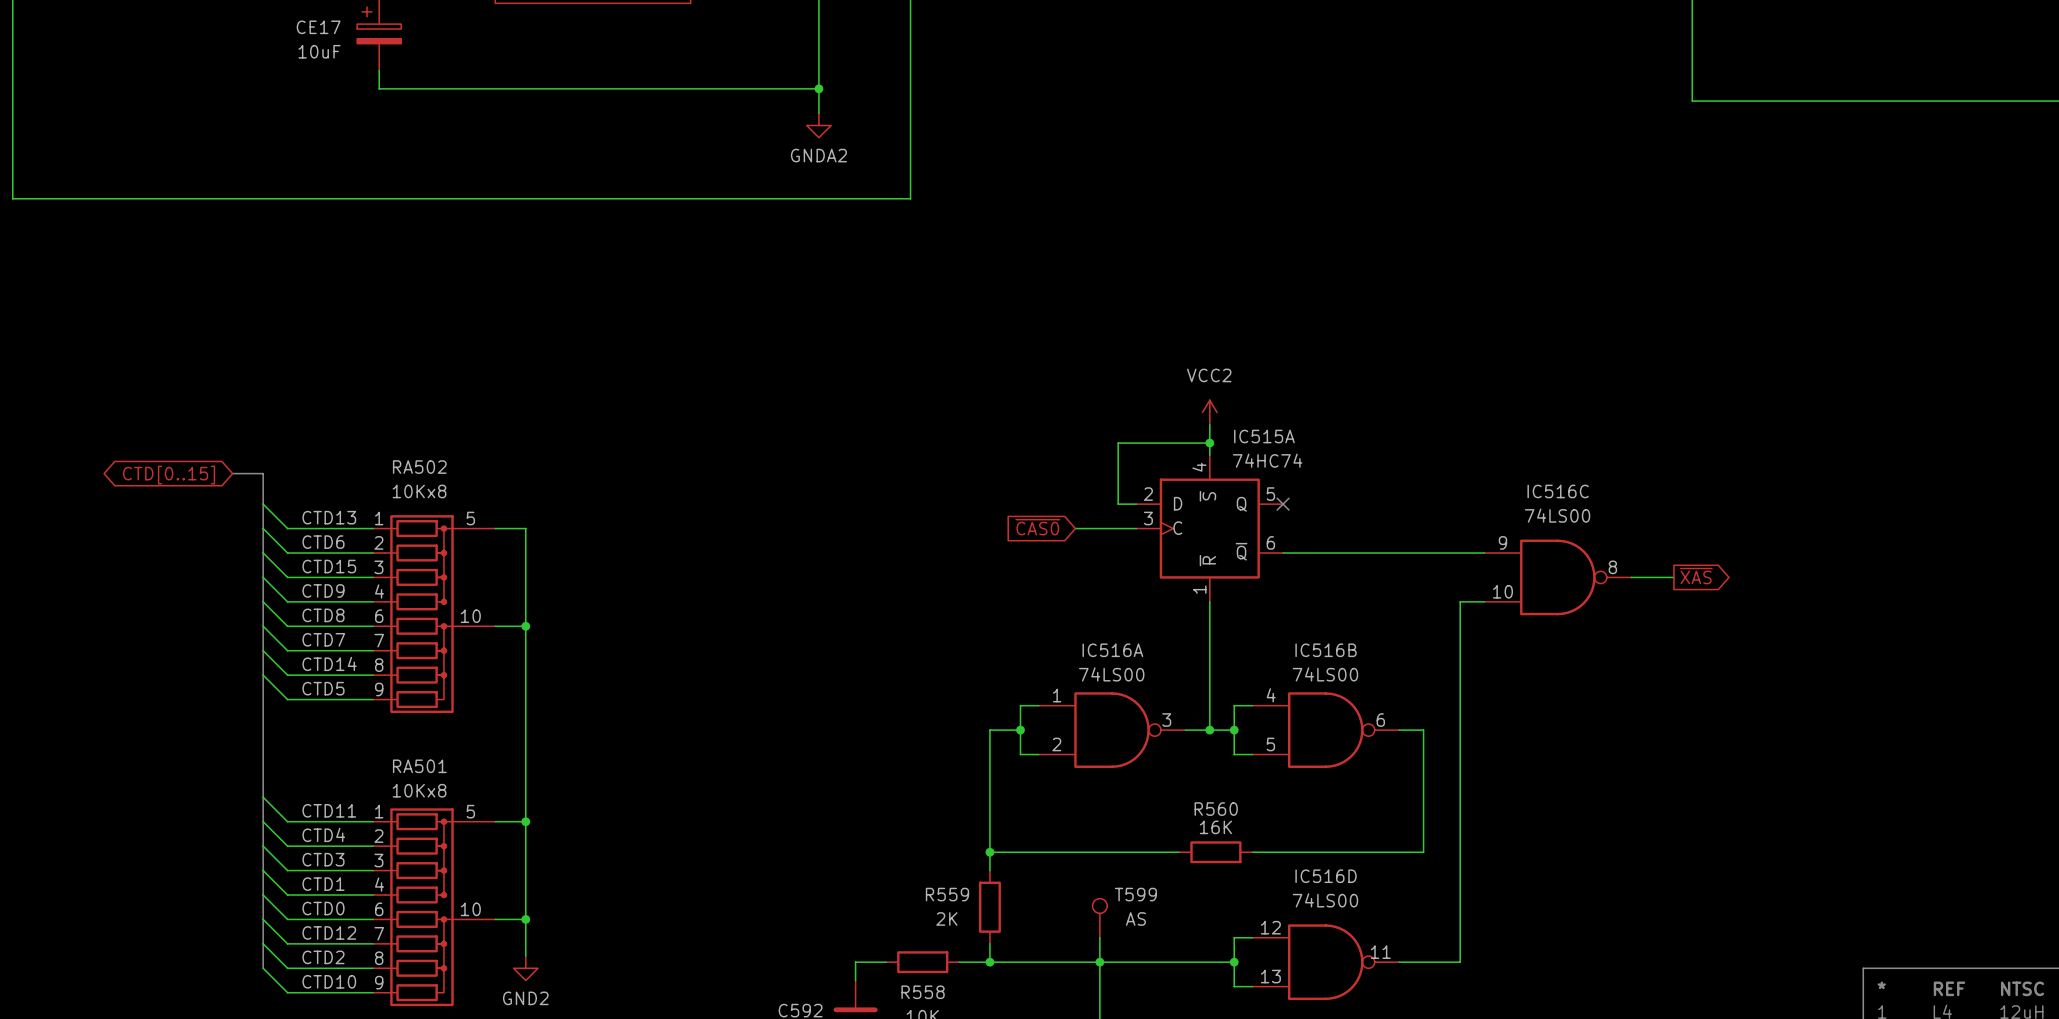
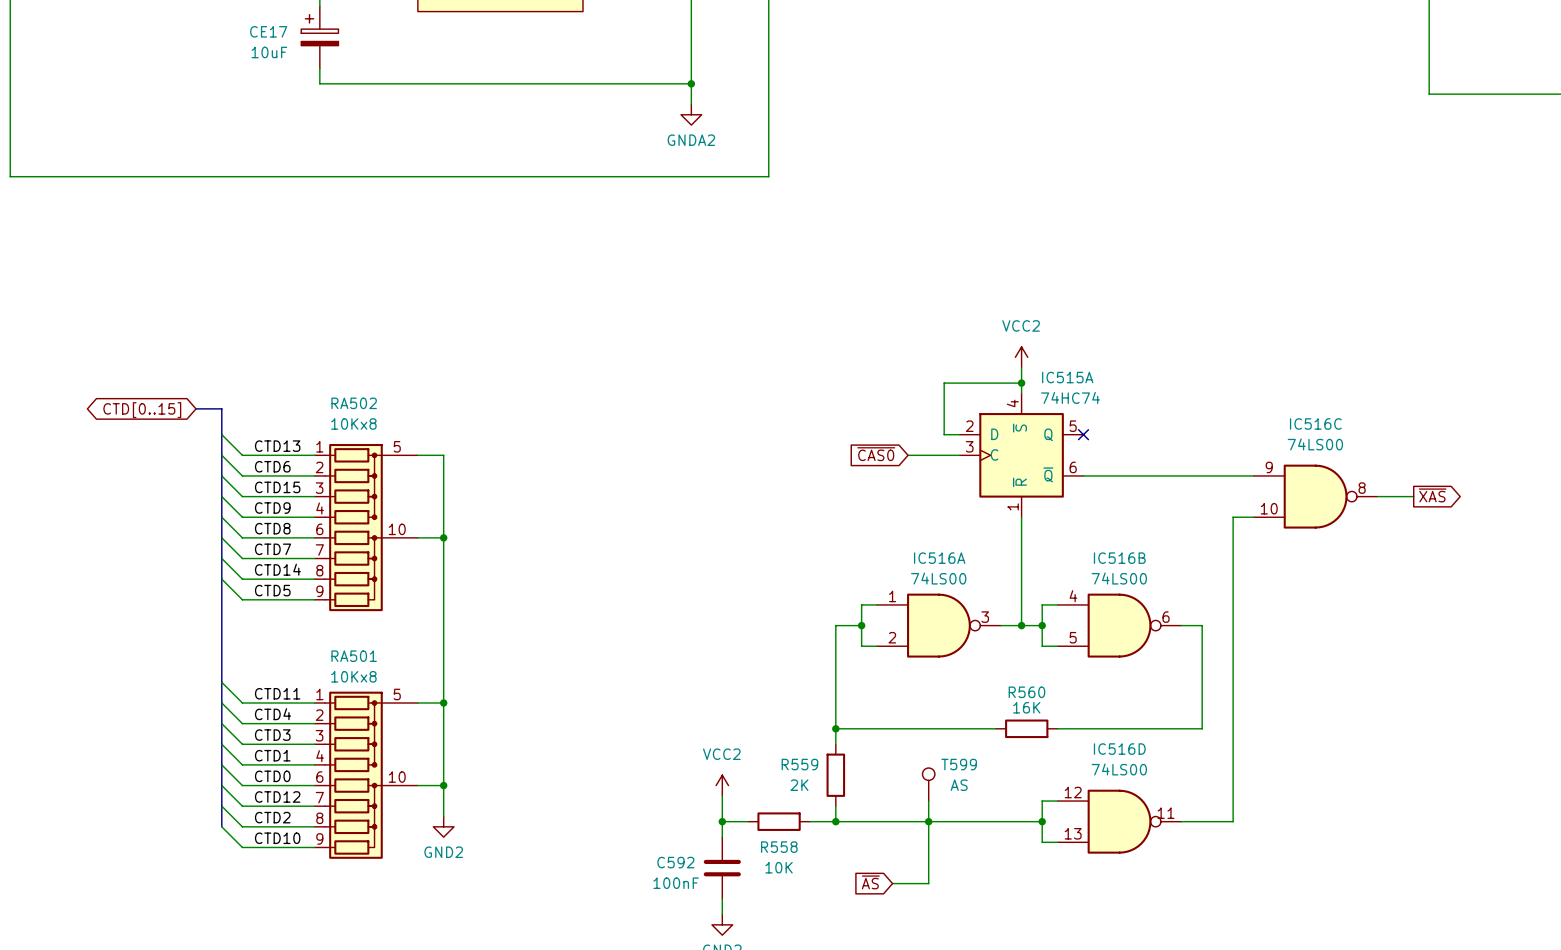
power symbol: none -> VCC2 (722, 785)
wire: none -> (722, 795) (722, 821)
junction: none -> (722, 821)

